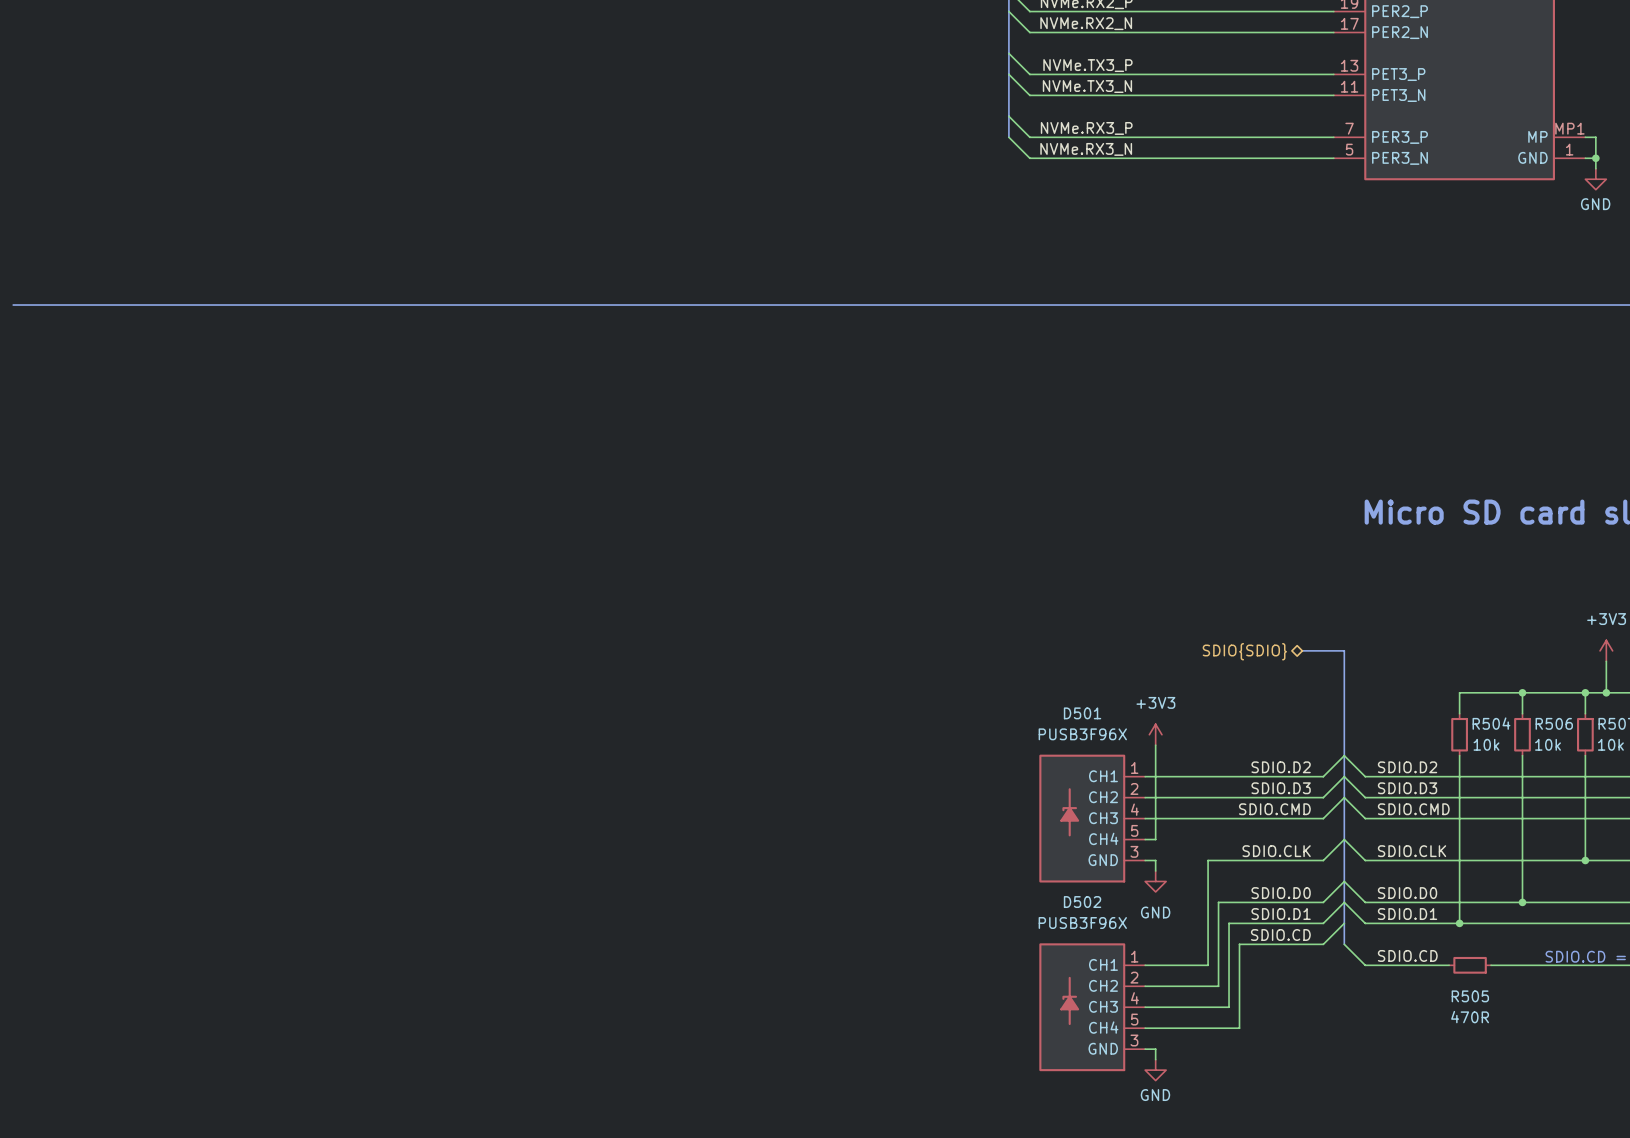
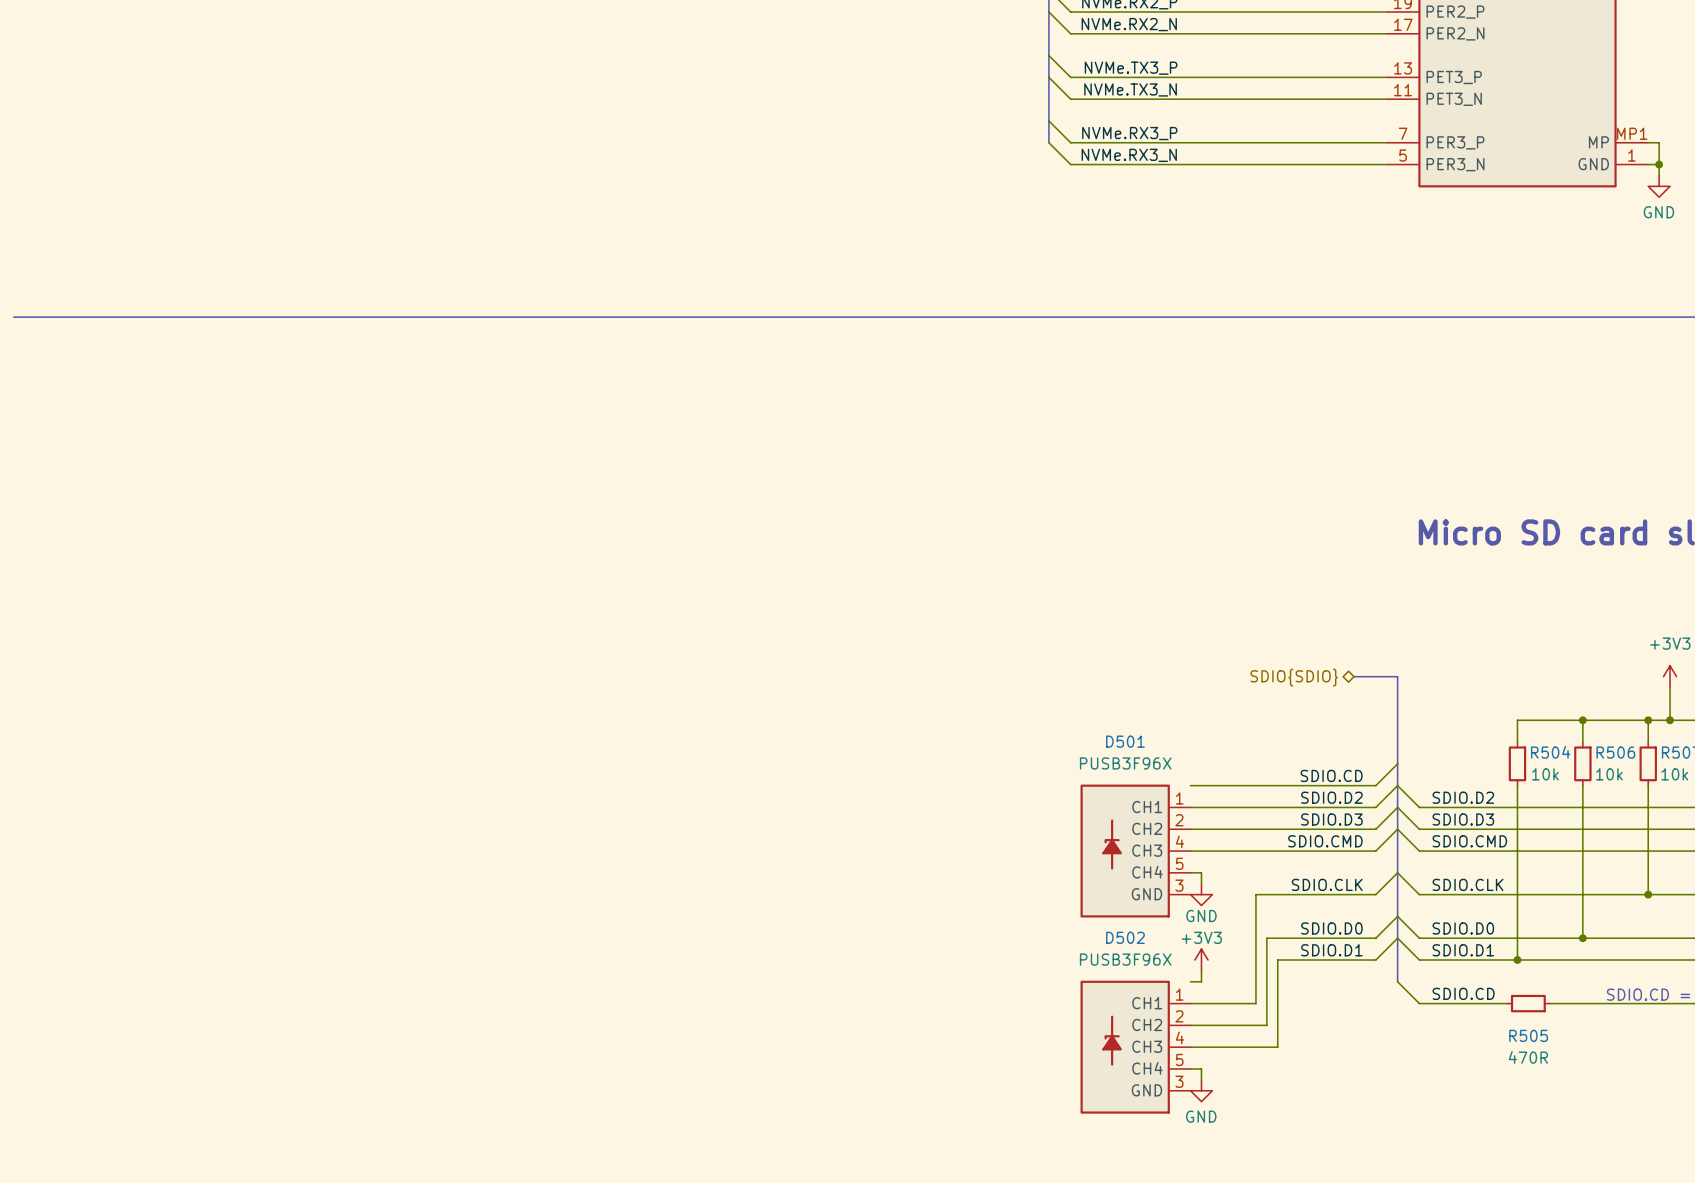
power symbol text position: +3V3 (1155, 702) -> +3V3 (1201, 937)
power symbol position: +3V3 (1155, 734) -> +3V3 (1201, 960)
wire: none -> (1397, 763) (1375, 785) (1190, 785)
wire: (1155, 745) (1155, 839) -> (1201, 883) (1201, 872)
power symbol position: GND (1155, 881) -> GND (1201, 894)
power symbol text position: GND (1155, 912) -> GND (1201, 916)
wire: (1344, 923) (1323, 944) (1239, 944) (1239, 1028) (1155, 1028) -> (1201, 1079) (1201, 1068)
wire: none -> (1201, 970) (1201, 981) (1190, 981)
label position: SDIO.CD (1280, 935) -> SDIO.CD (1331, 775)
power symbol position: GND (1155, 1070) -> GND (1201, 1090)

